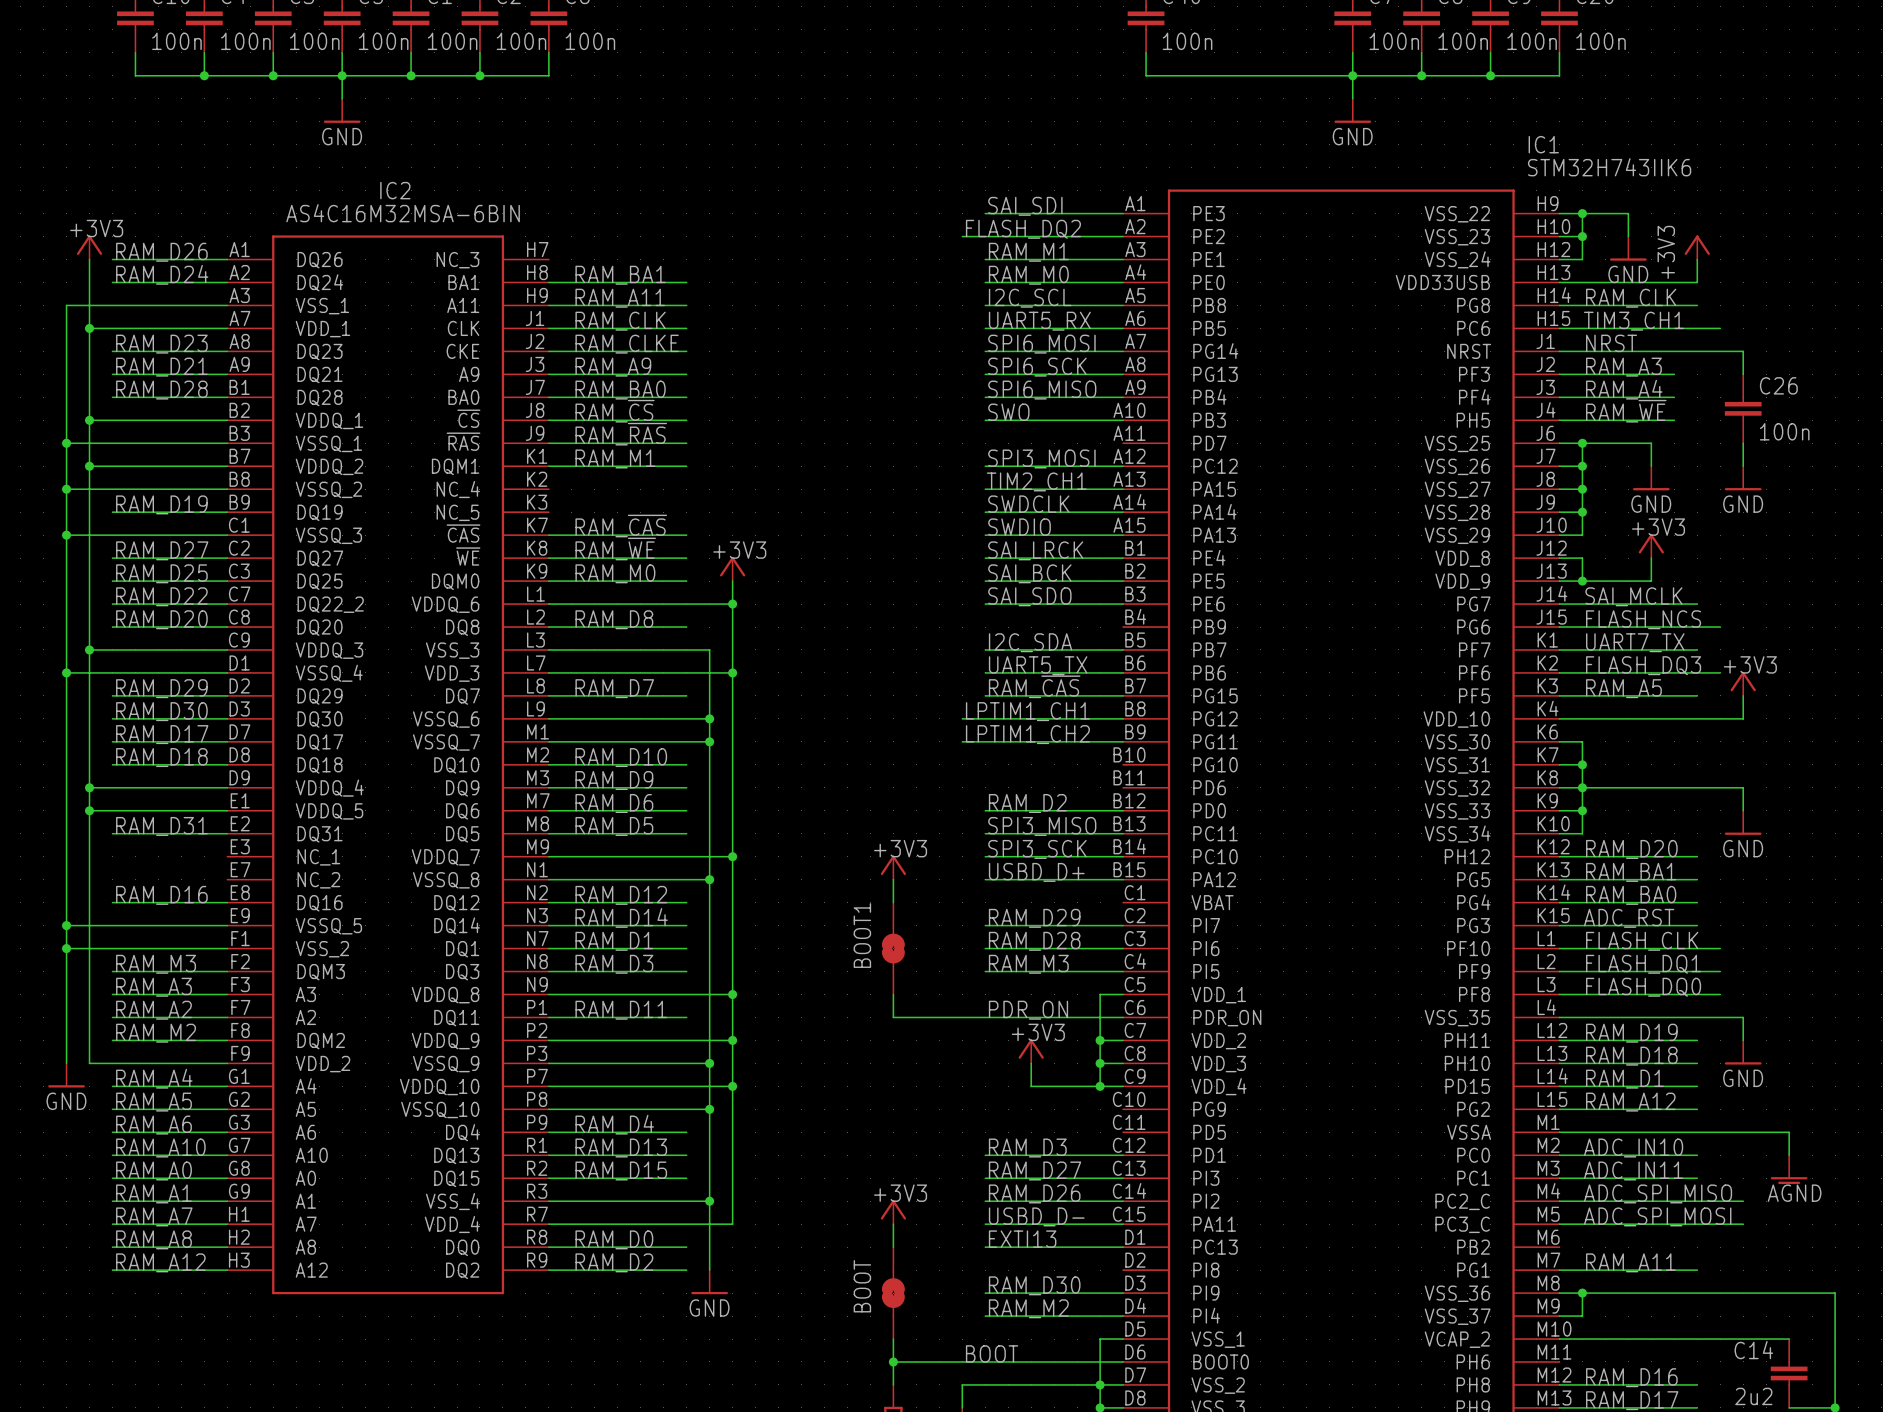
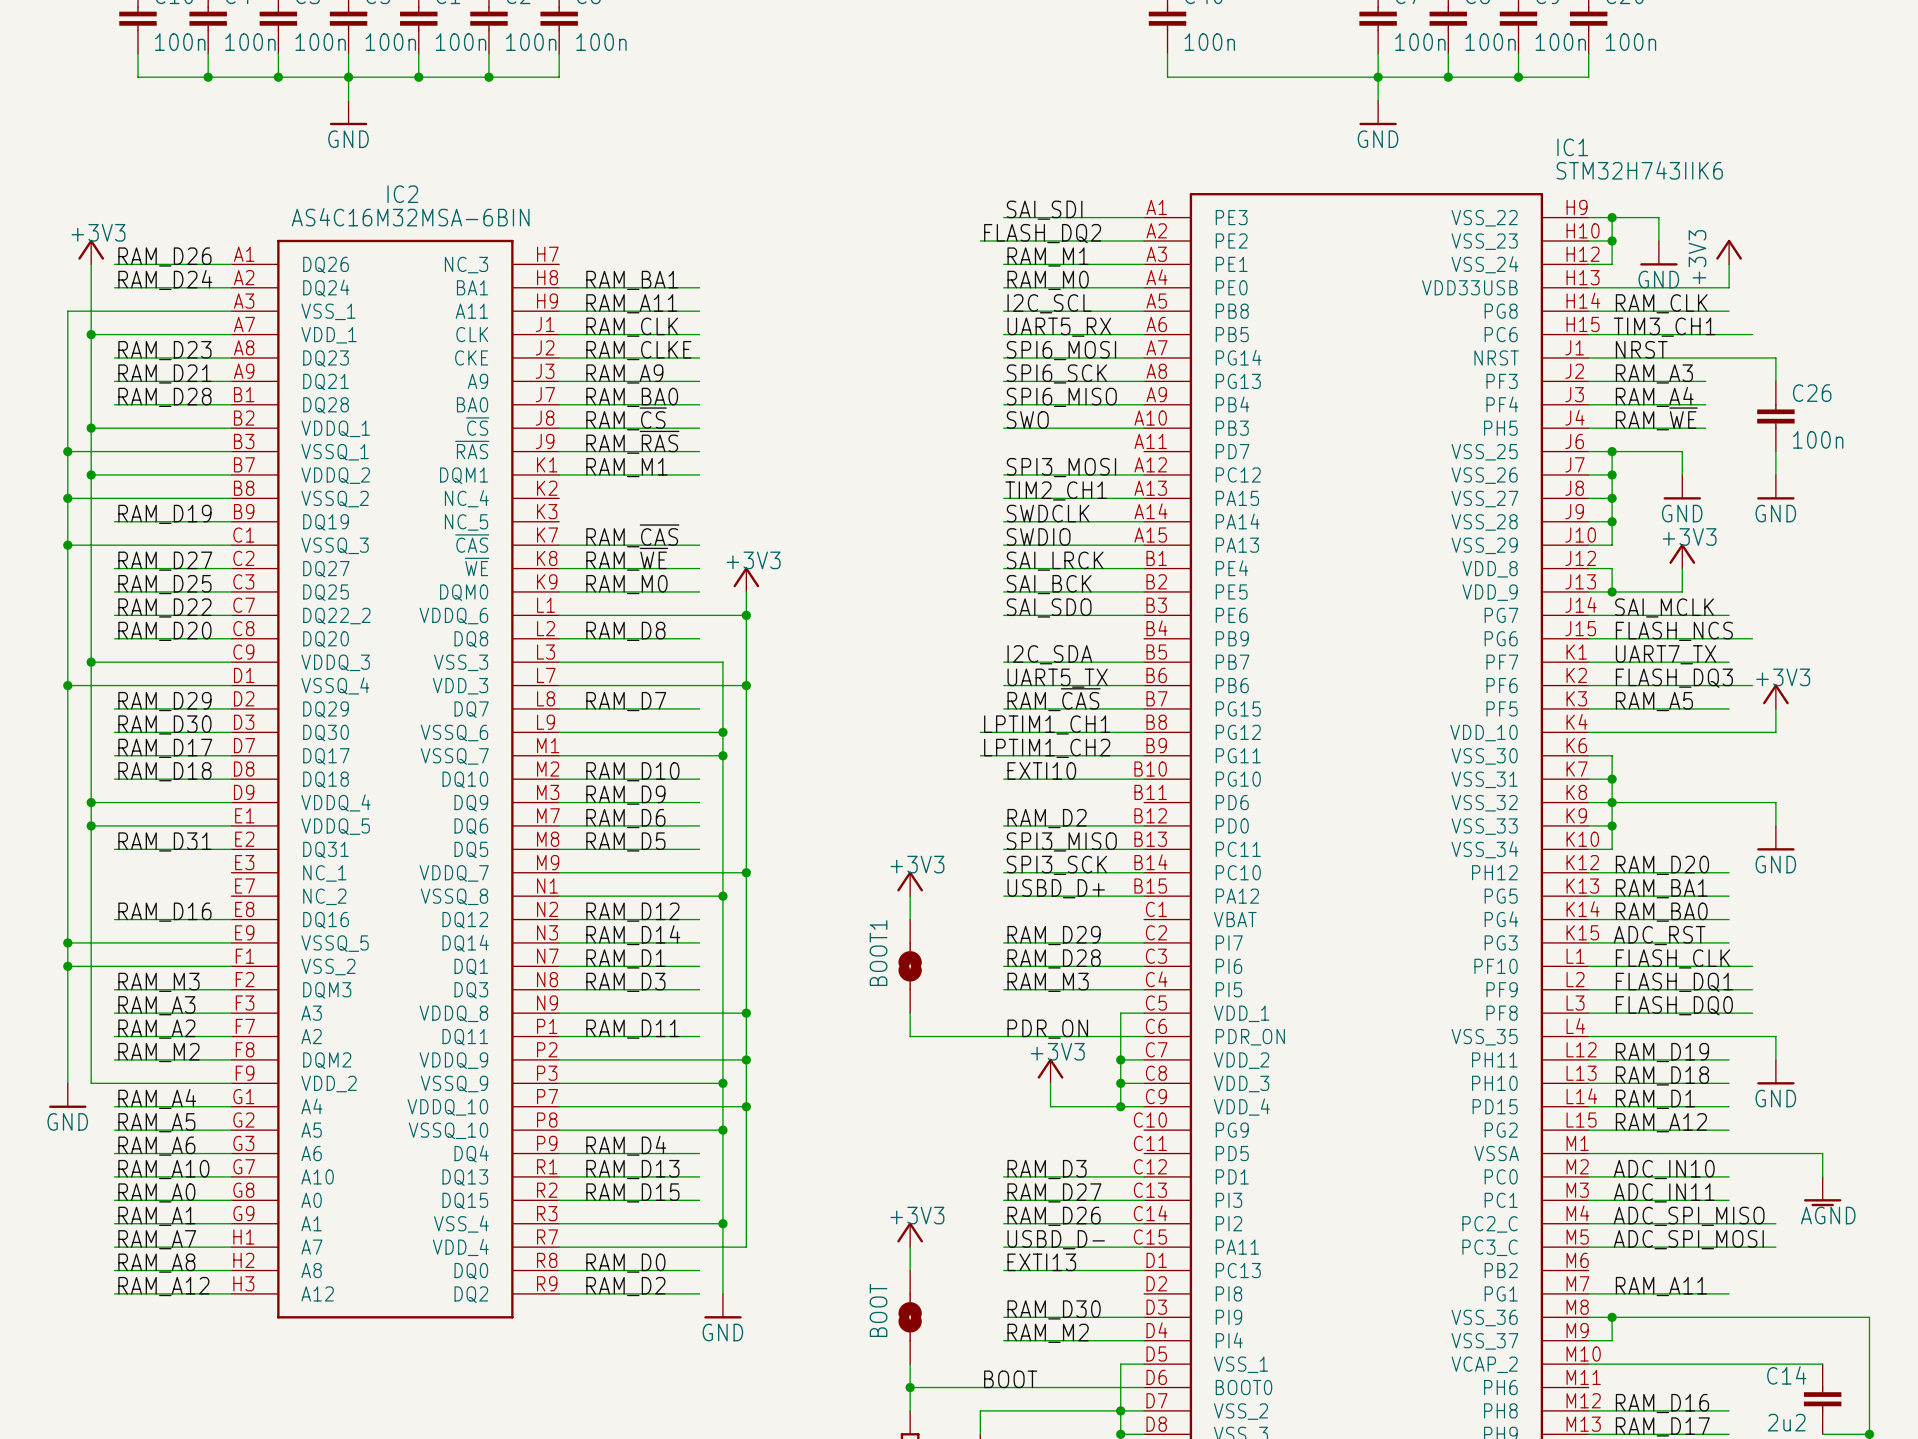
label: none -> EXTI10 (1041, 770)
wire: none -> (1003, 779) (1144, 779)

